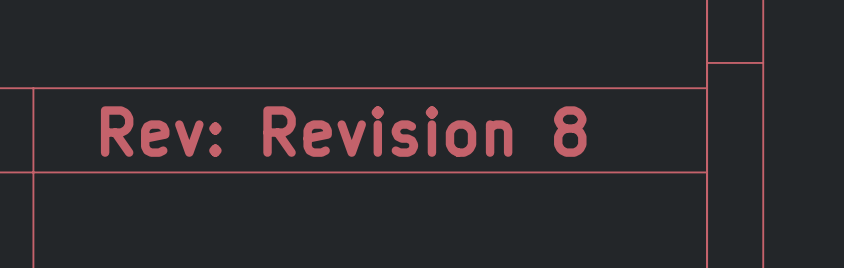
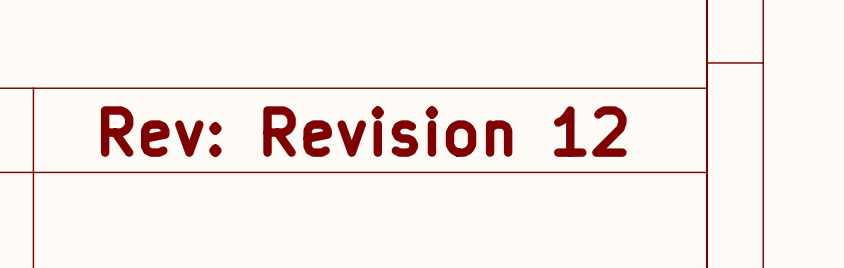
title block: Rev: Revision 8 (343, 131) -> Rev: Revision 12 (363, 131)

